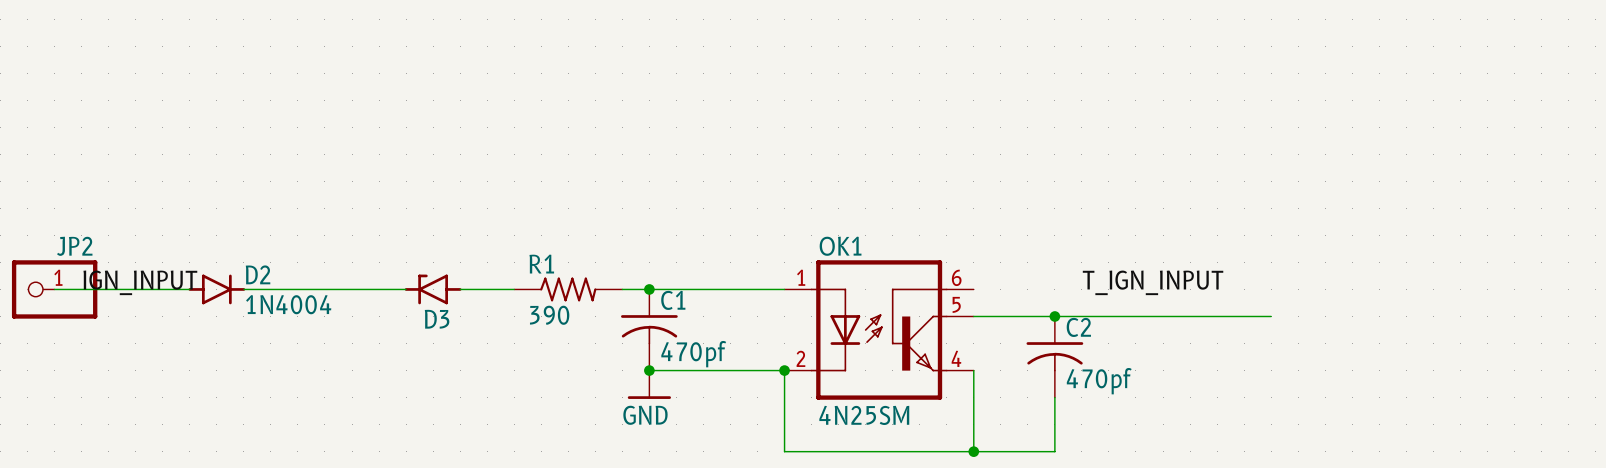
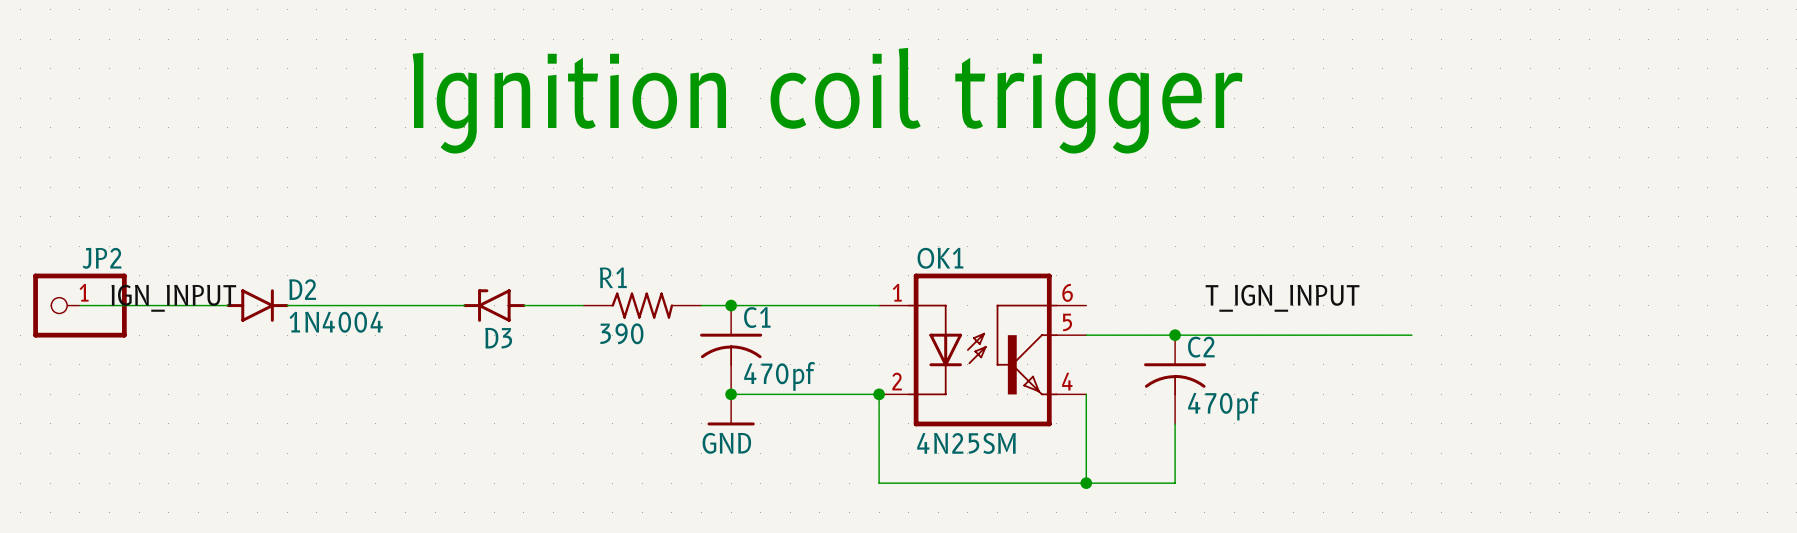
text: none -> Ignition coil trigger (827, 100)

